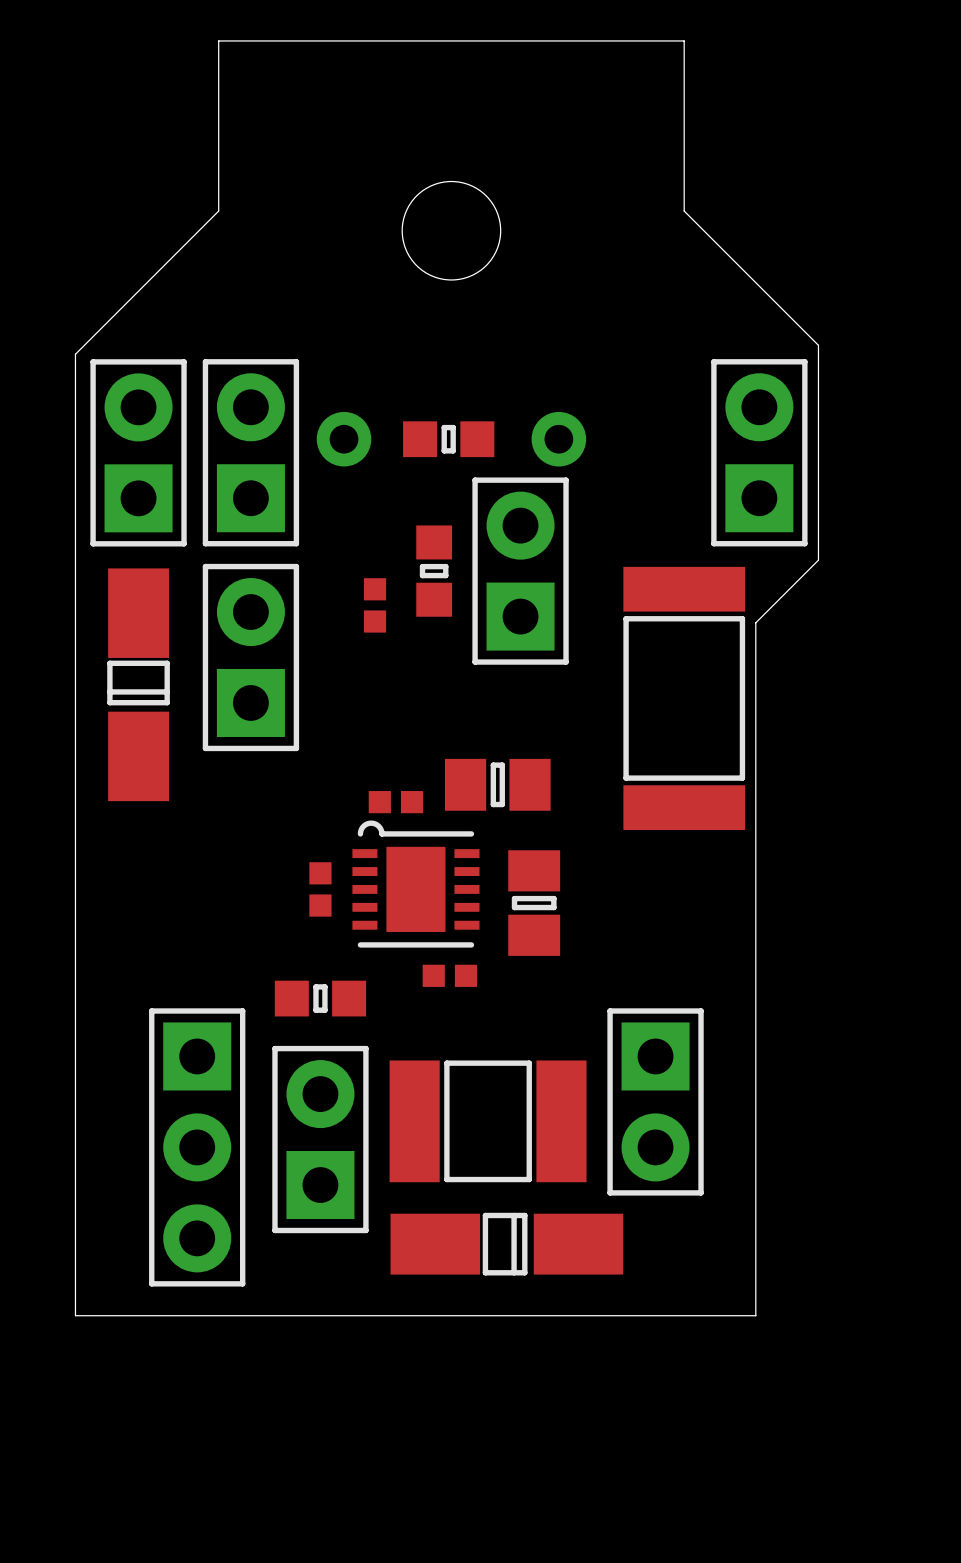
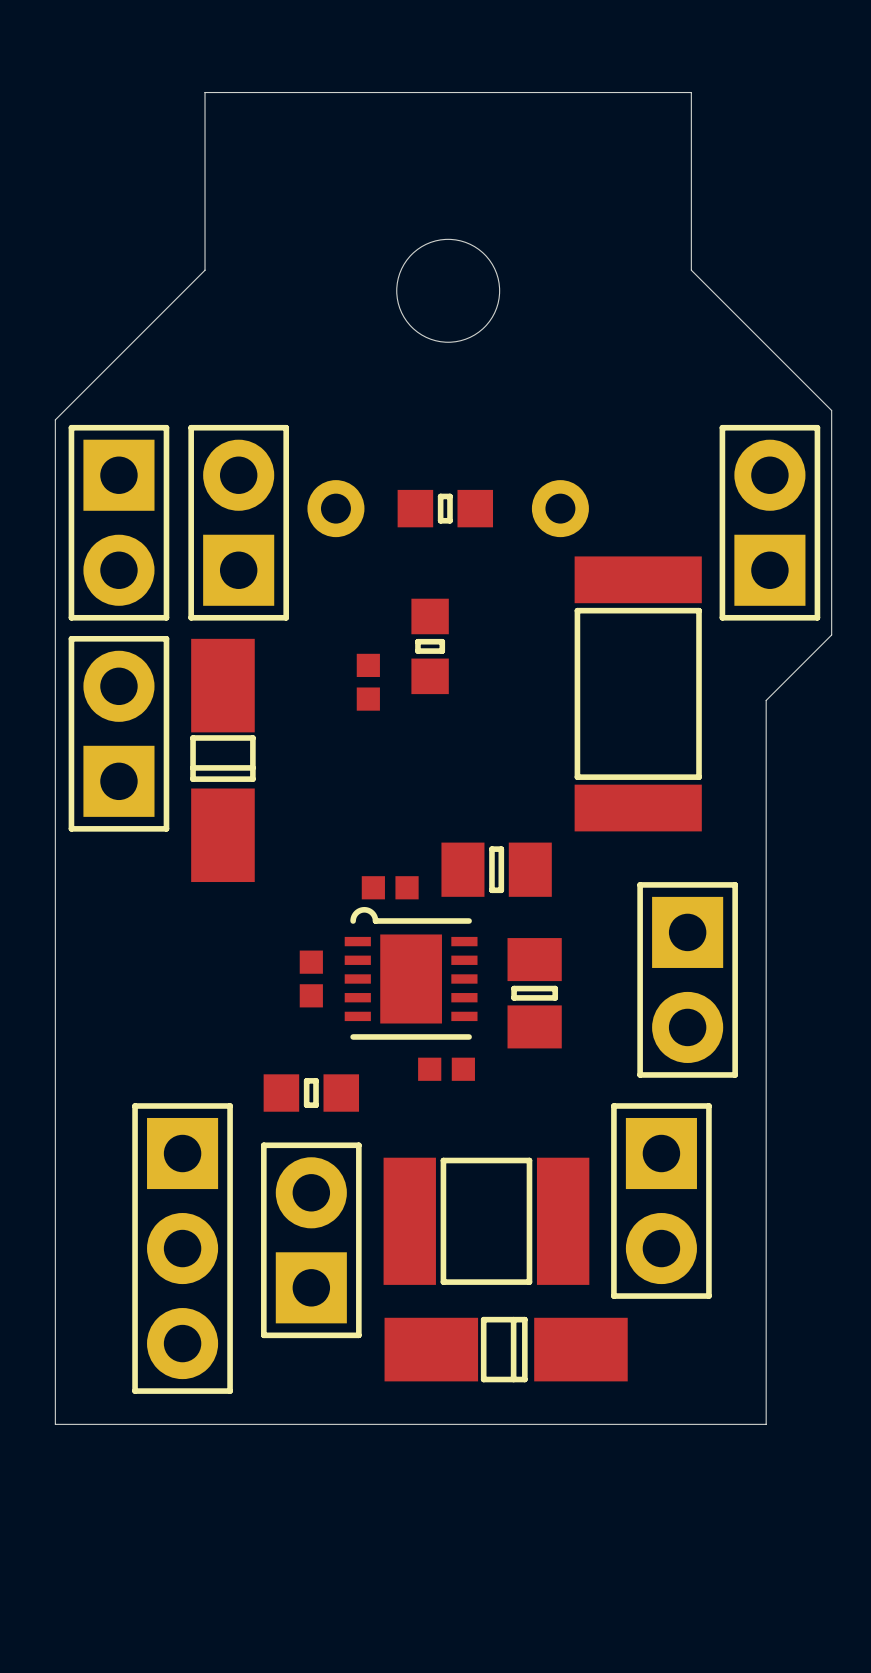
part rotation: 0° (138, 452) -> 180° (118, 522)
part footprint: [202, 563, 300, 752] -> [190, 638, 256, 883]
part footprint: [107, 568, 170, 802] -> [68, 635, 170, 832]
part rotation: 0° (520, 571) -> 180° (687, 979)
part position: (520, 571) -> (687, 979)
part position: (684, 698) -> (638, 693)

